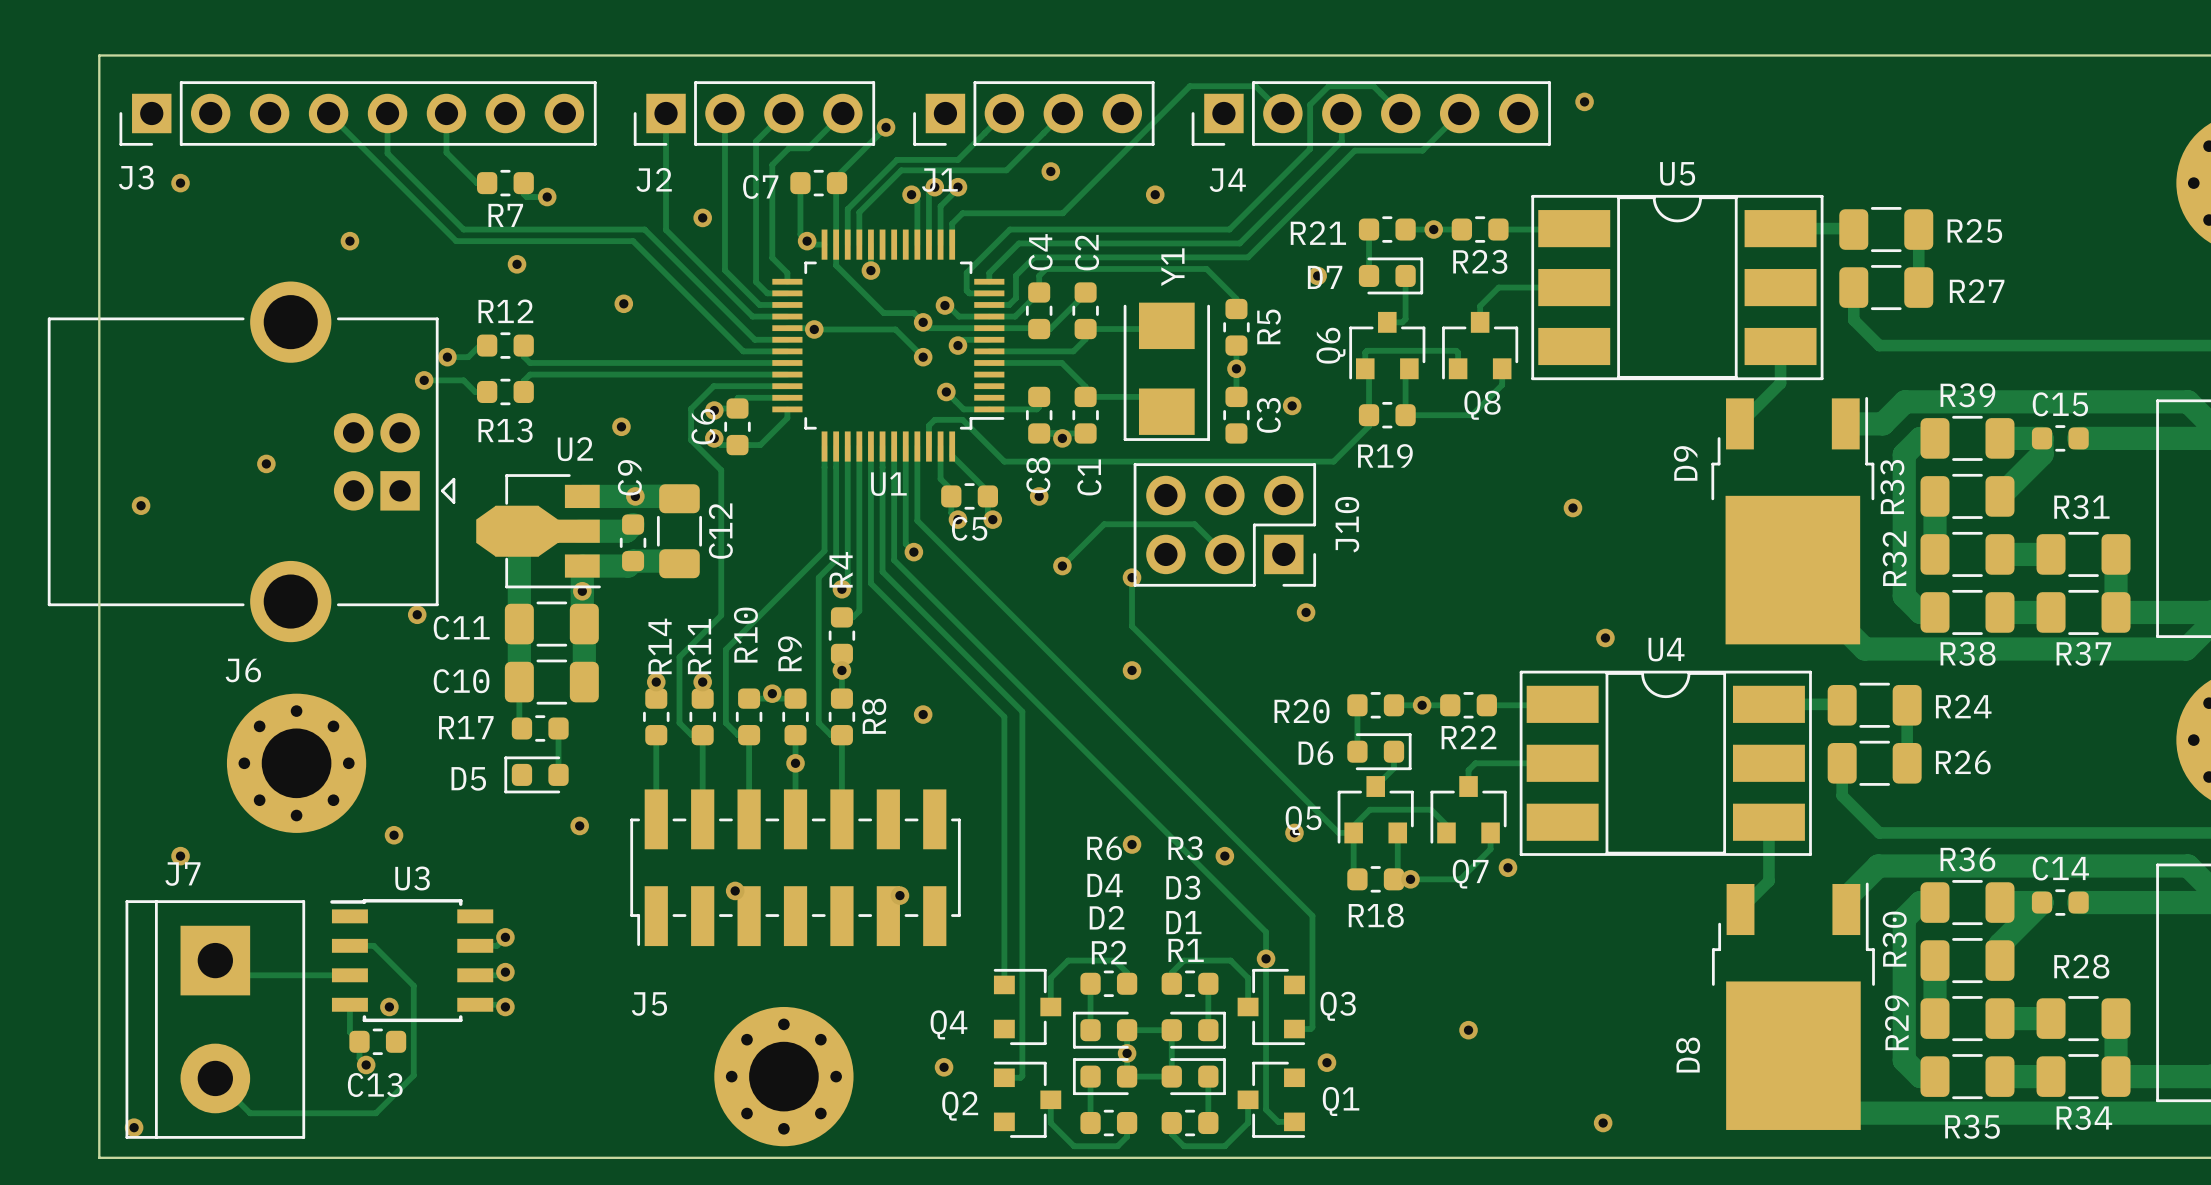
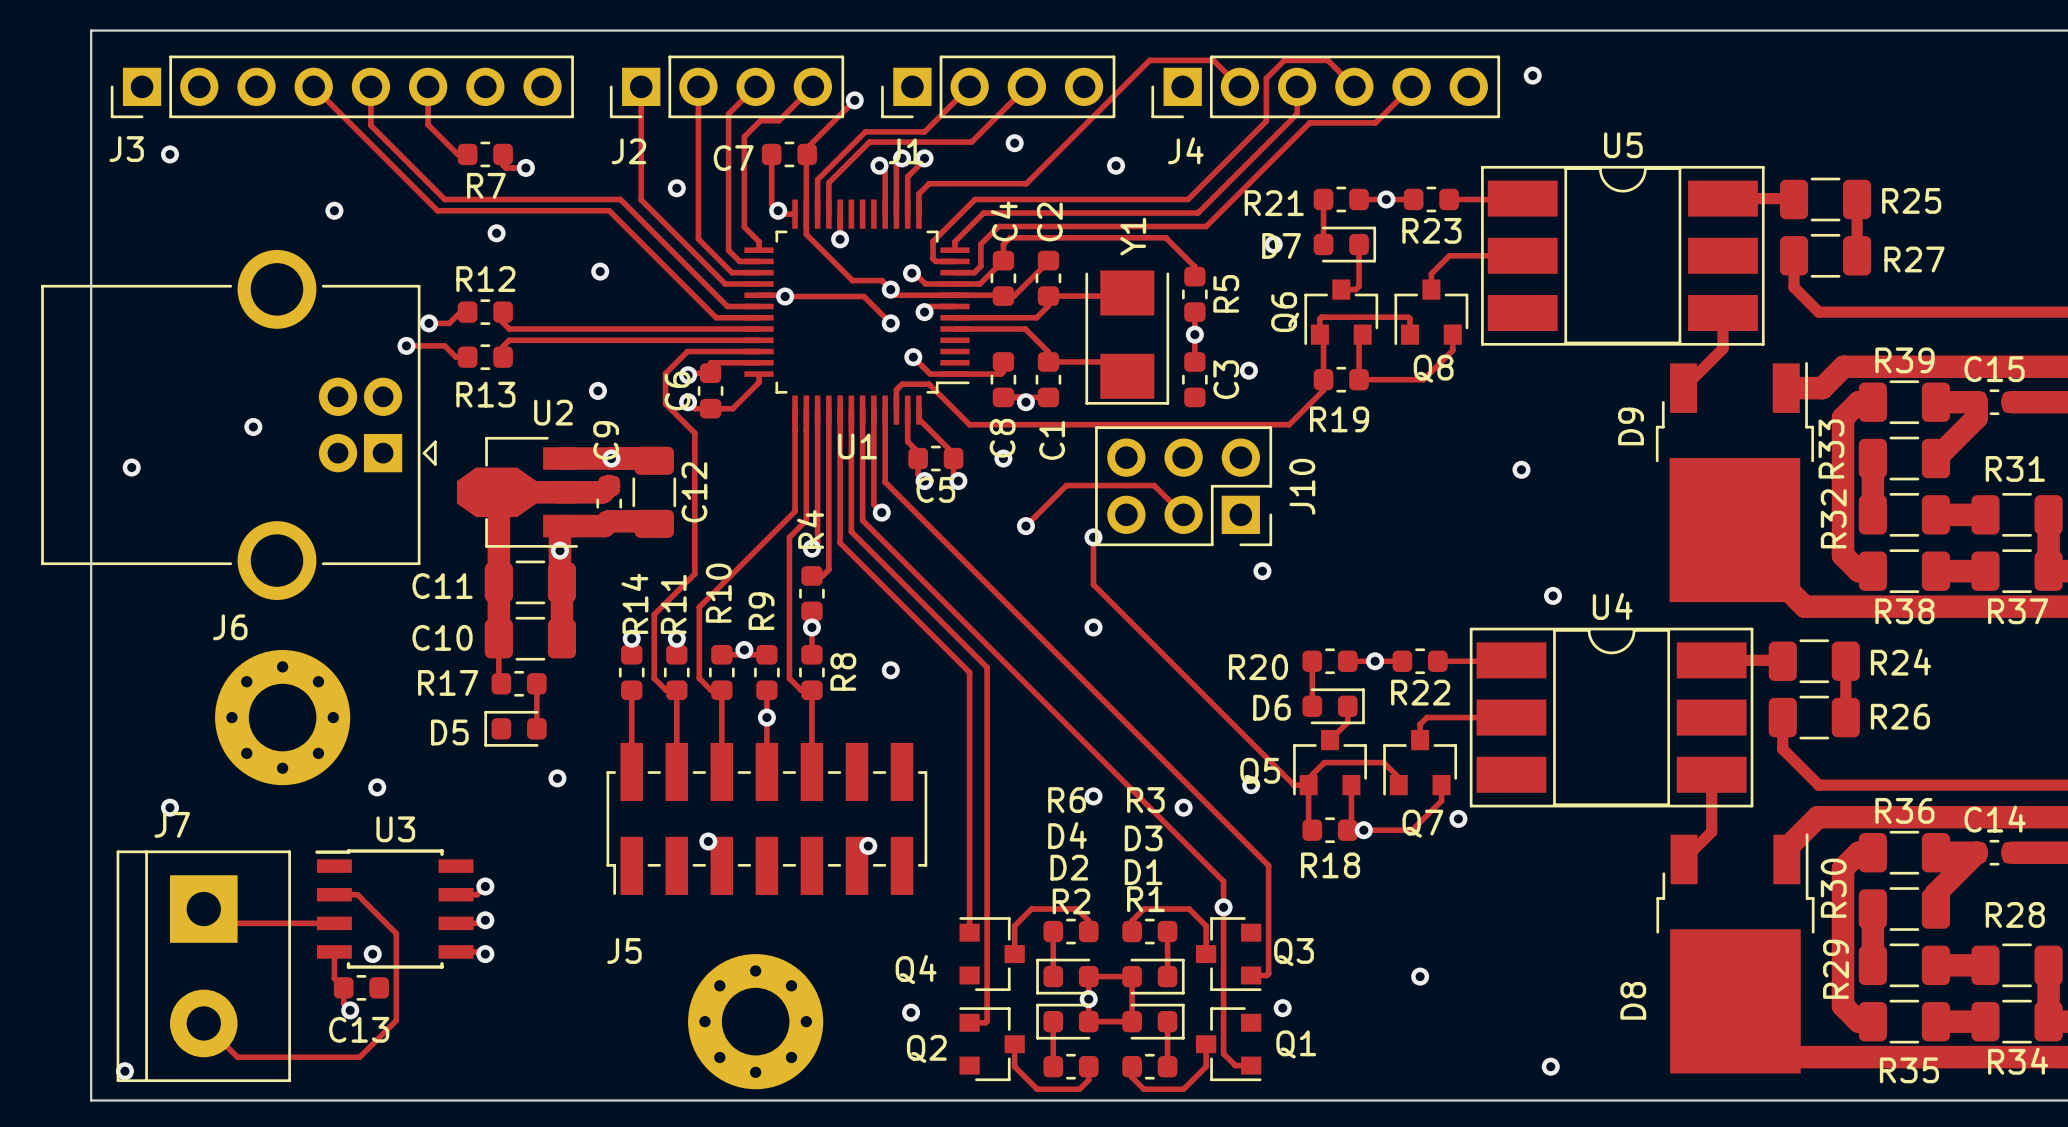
via: (417, 614) -> none

